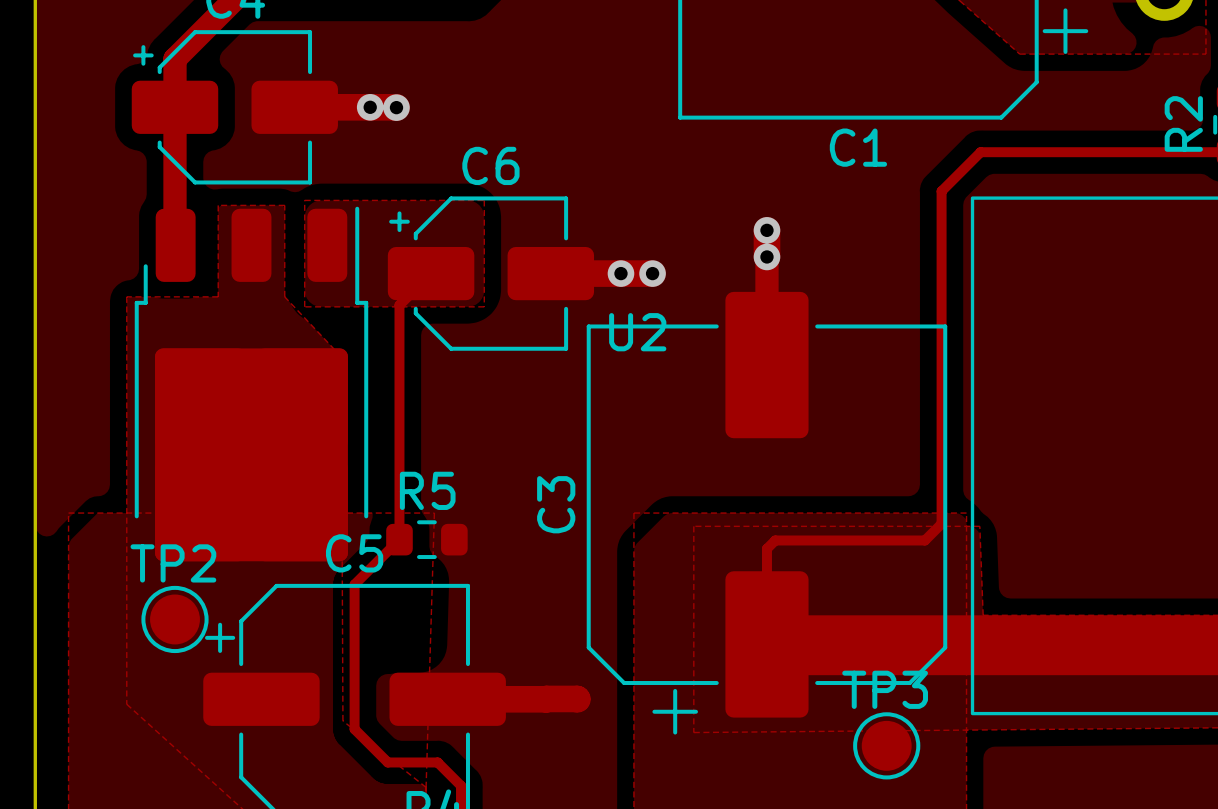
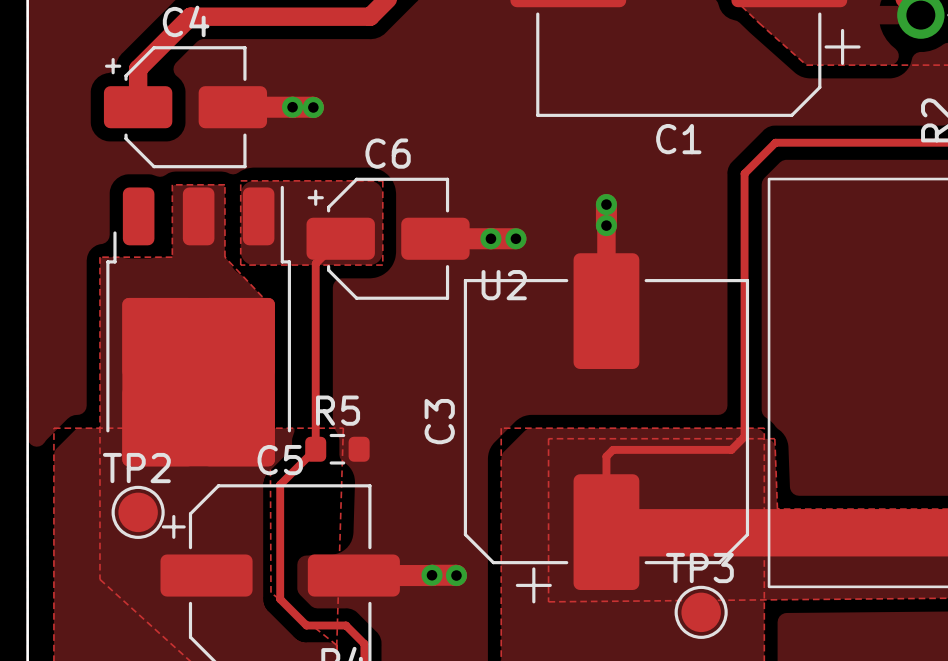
track: (174, 107) (175, 245) -> none
via: none -> (432, 575)
via: none -> (456, 575)

